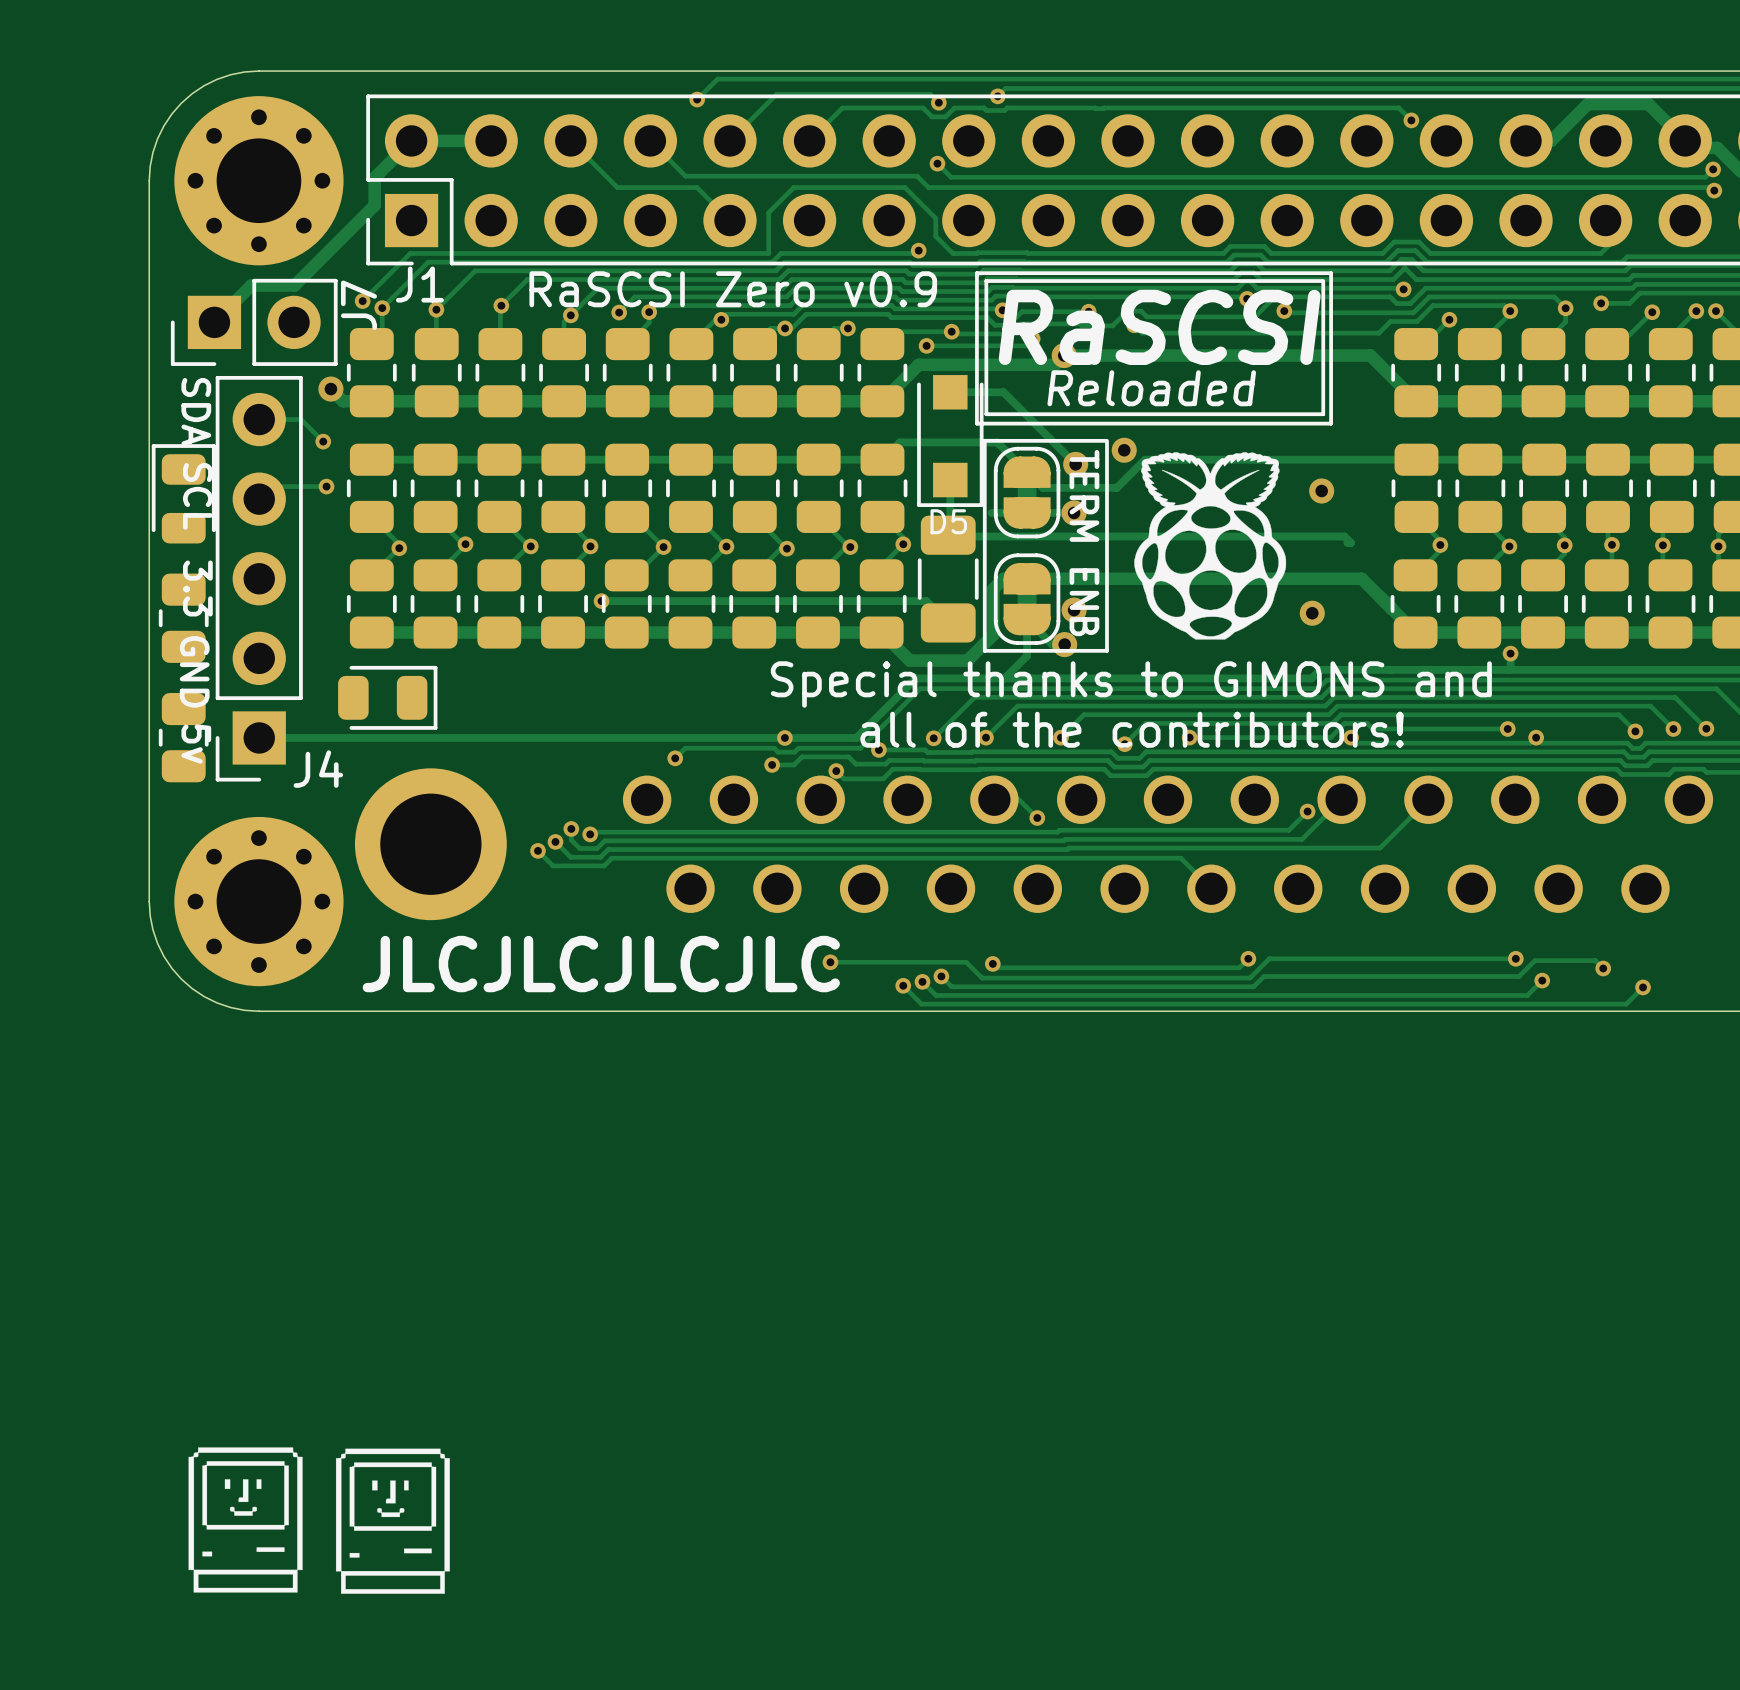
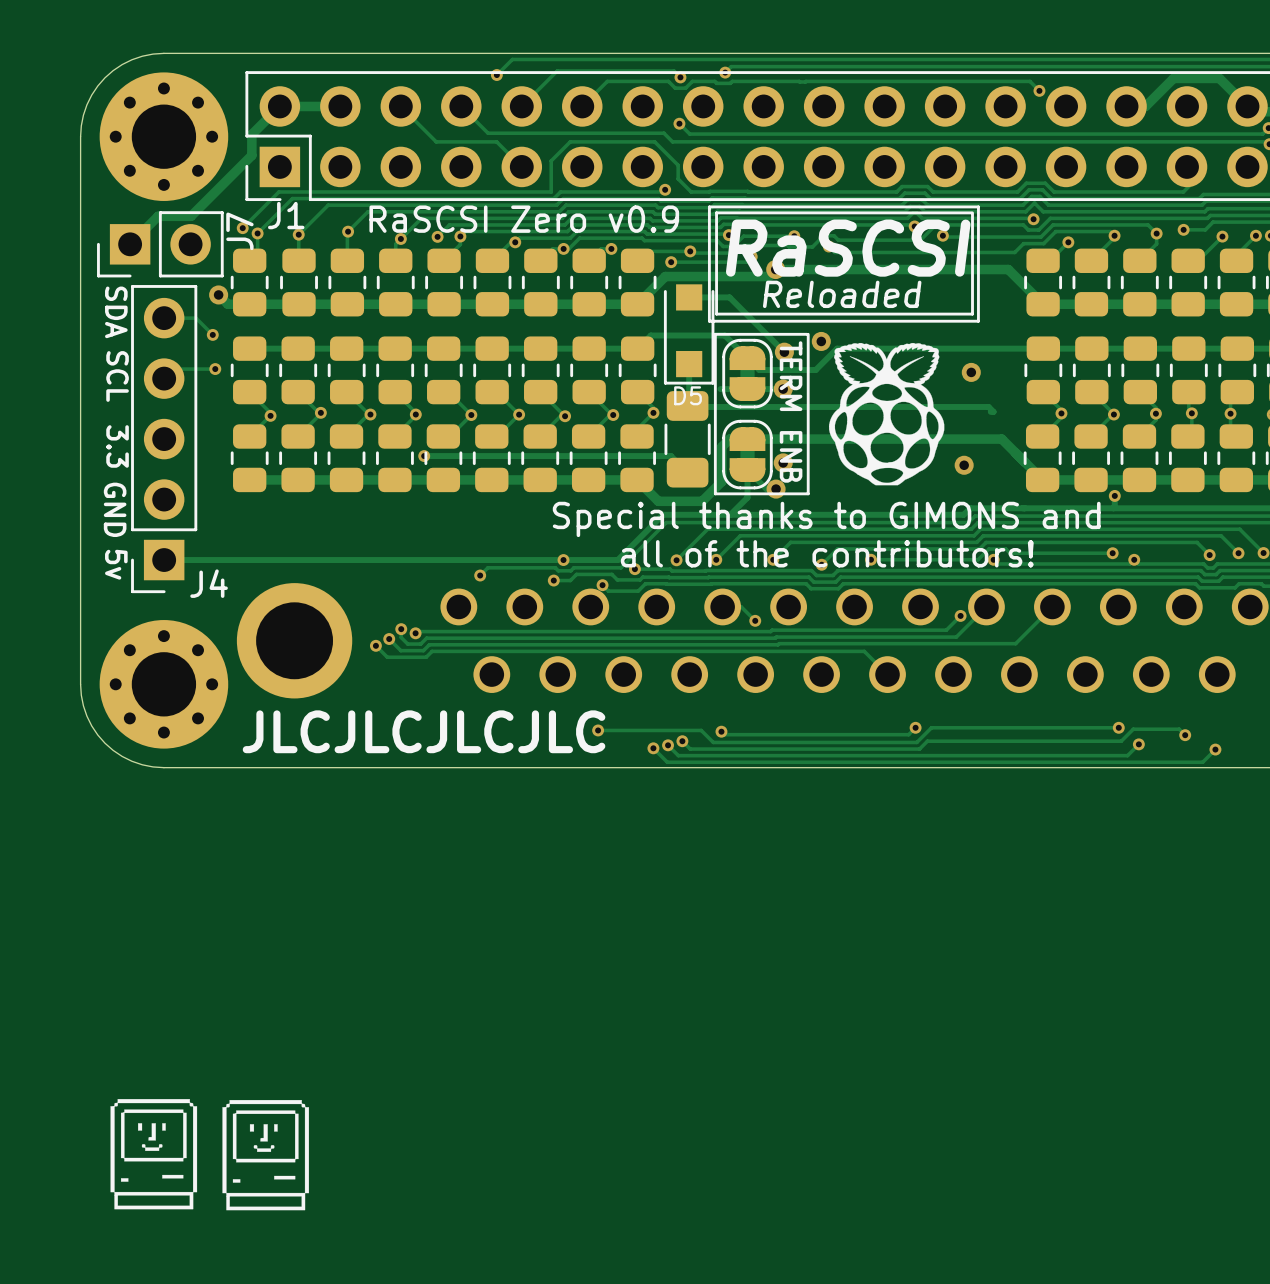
part: (183, 493) -> none
part: (183, 618) -> none
part: (387, 697) -> none
part: (183, 737) -> none

